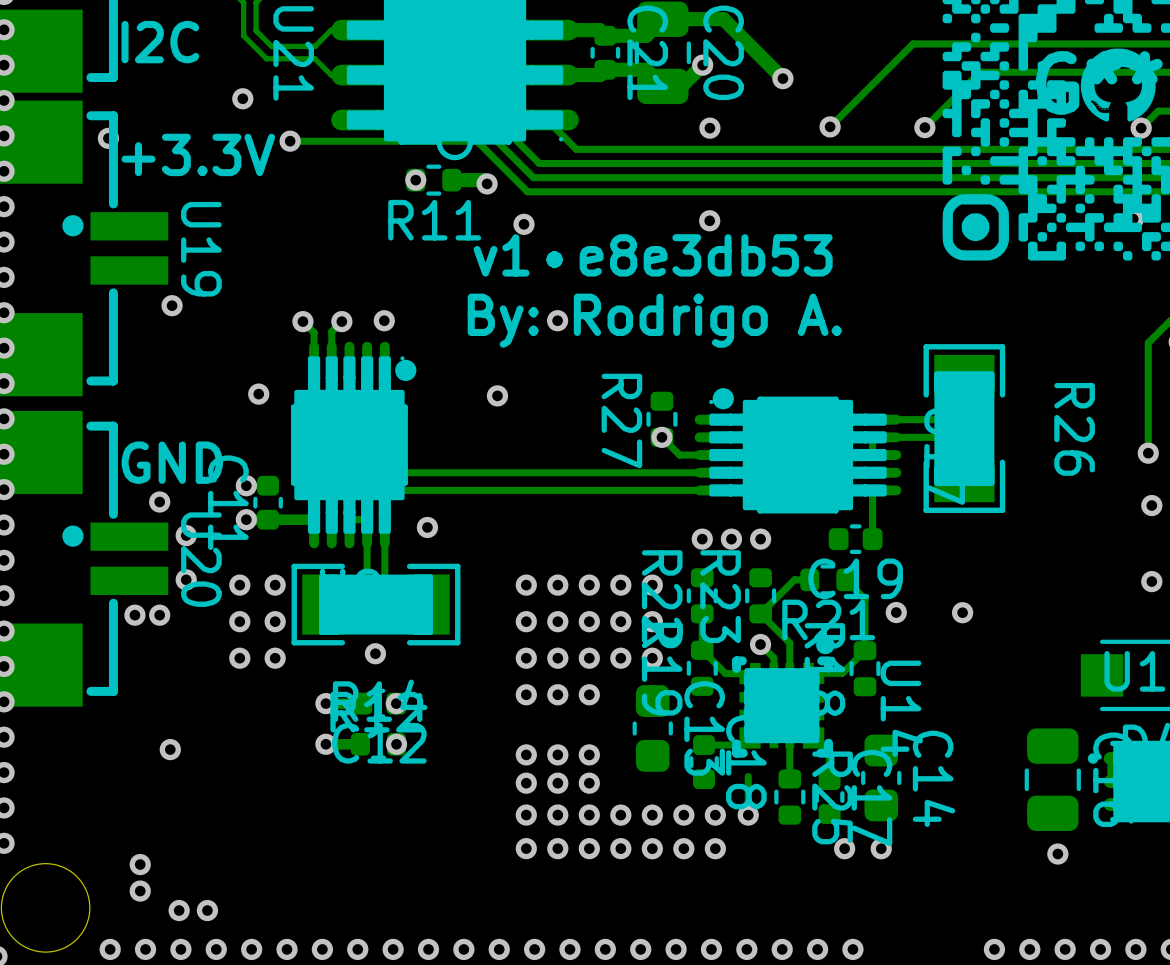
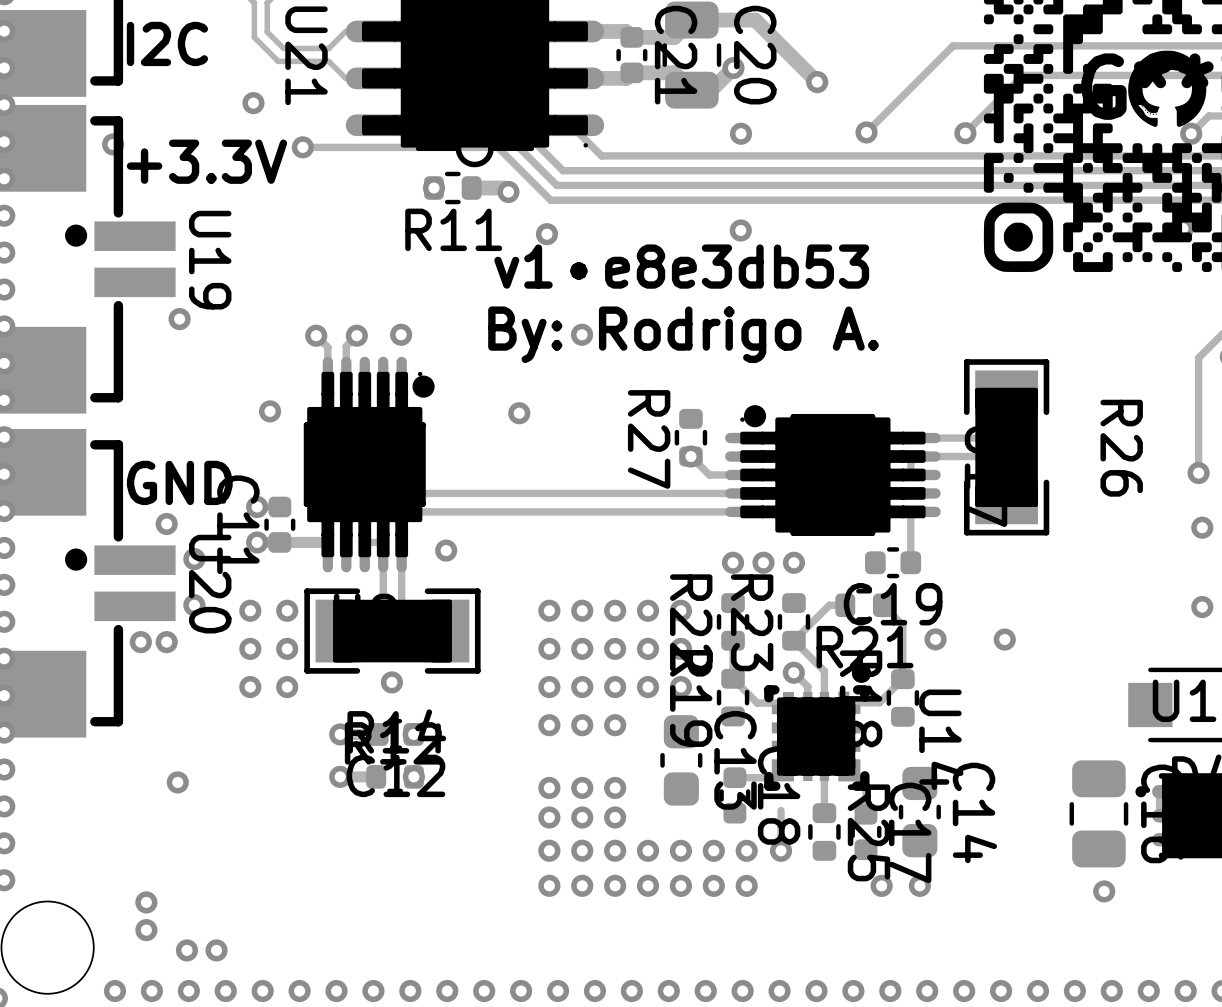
via: none -> (927, 991)
via: none -> (964, 991)
via: none -> (1001, 991)

